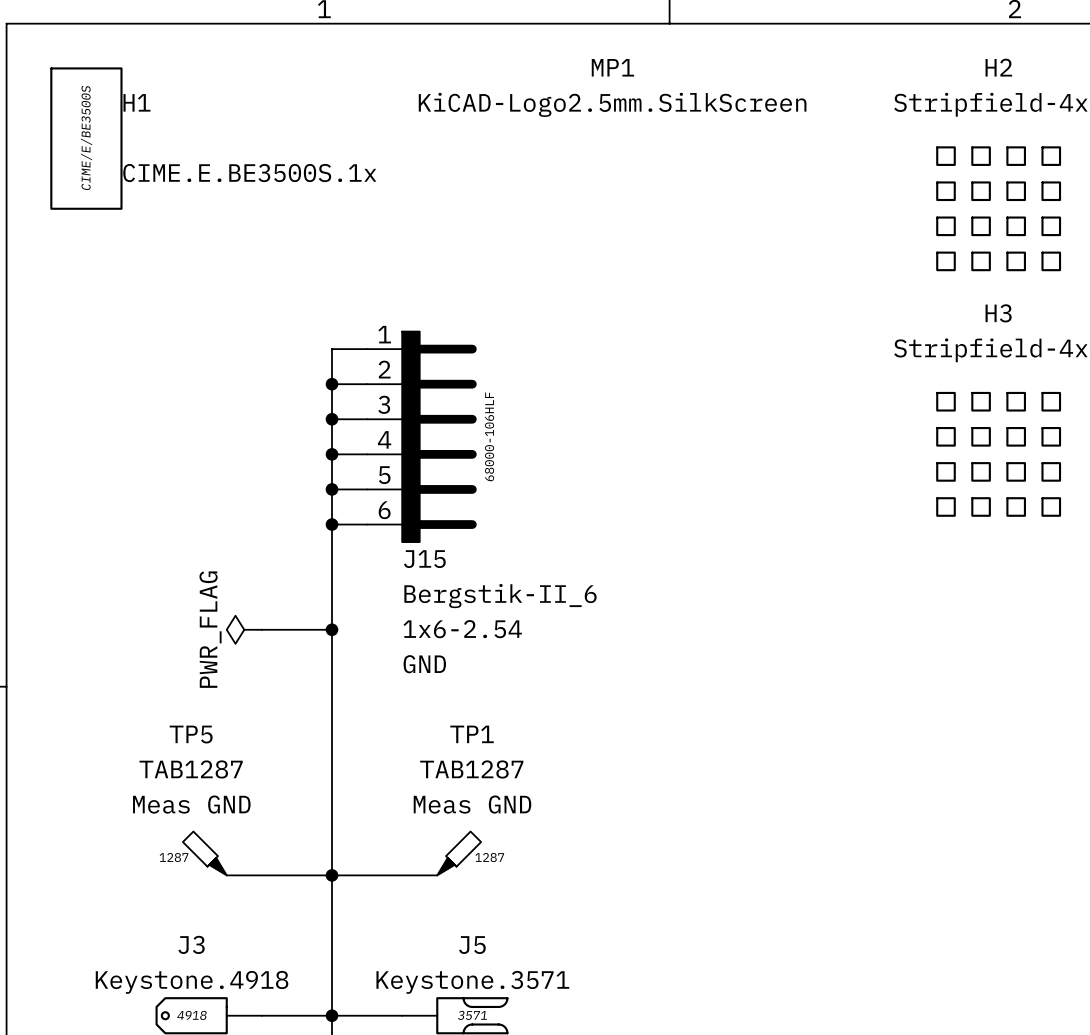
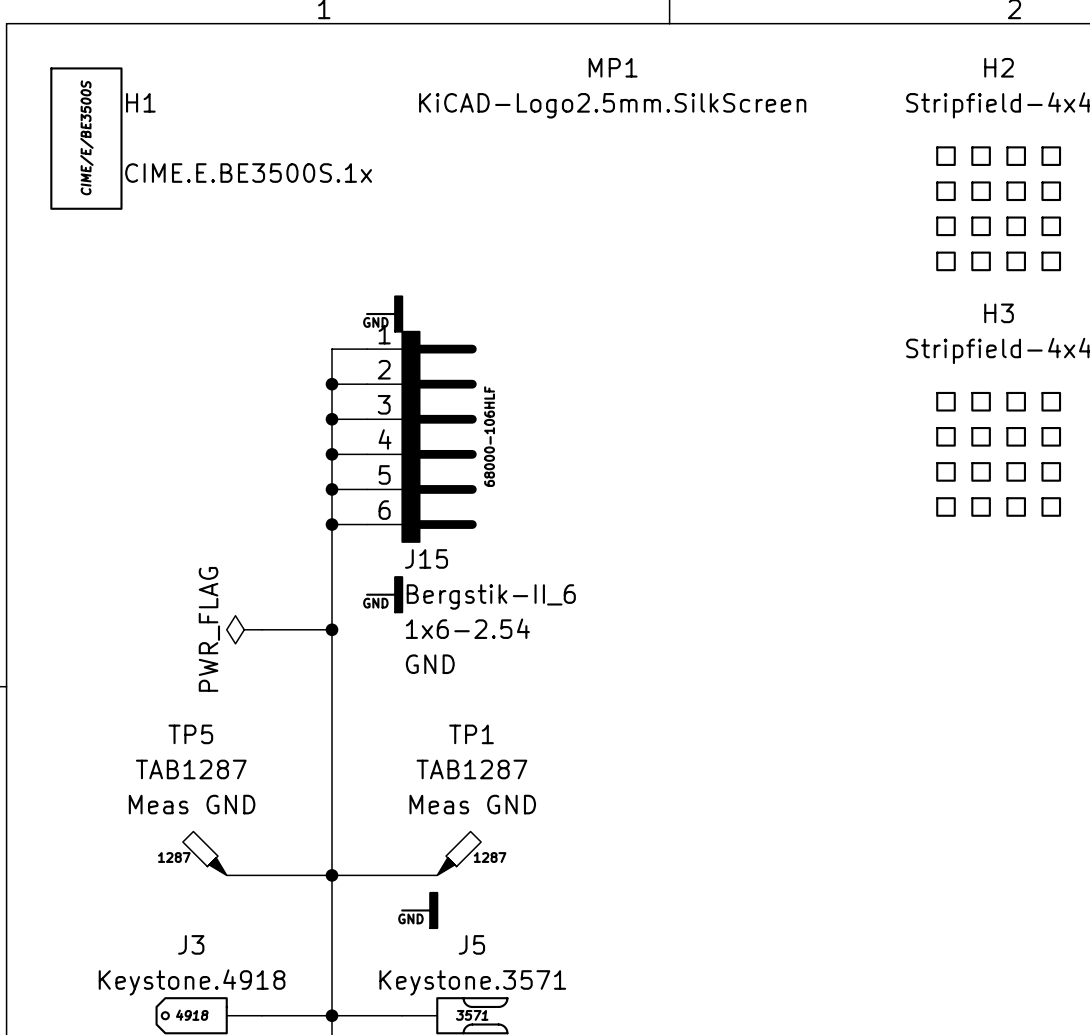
power symbol: none -> GND (384, 314)
power symbol: none -> GND (384, 594)
power symbol: none -> GND (419, 910)

